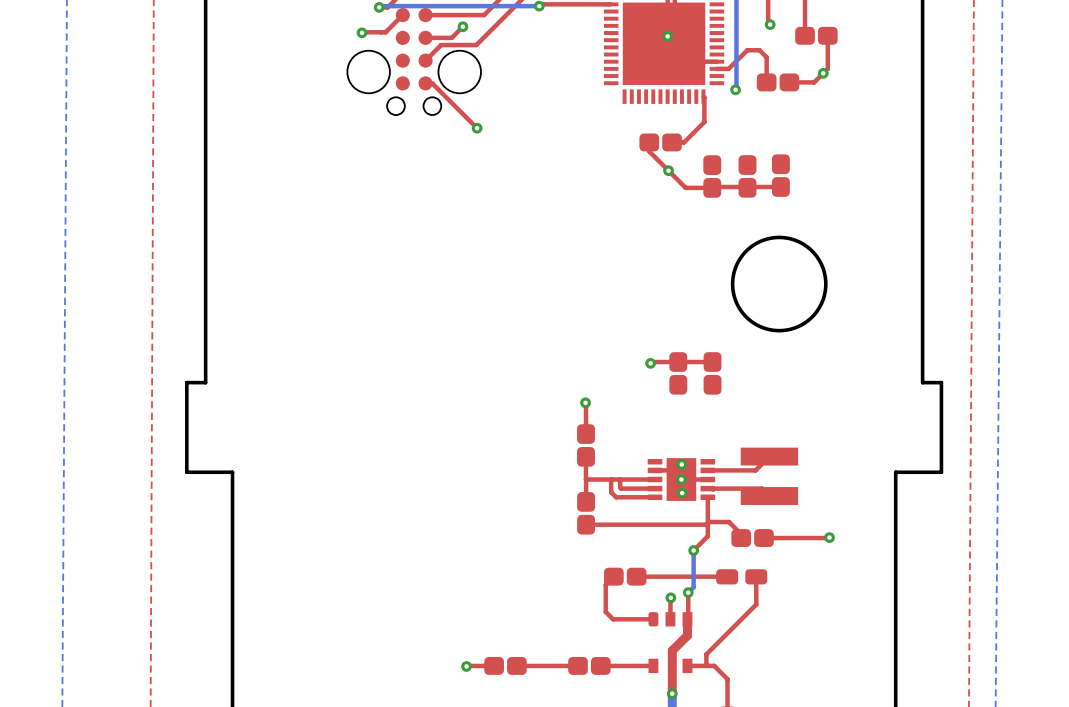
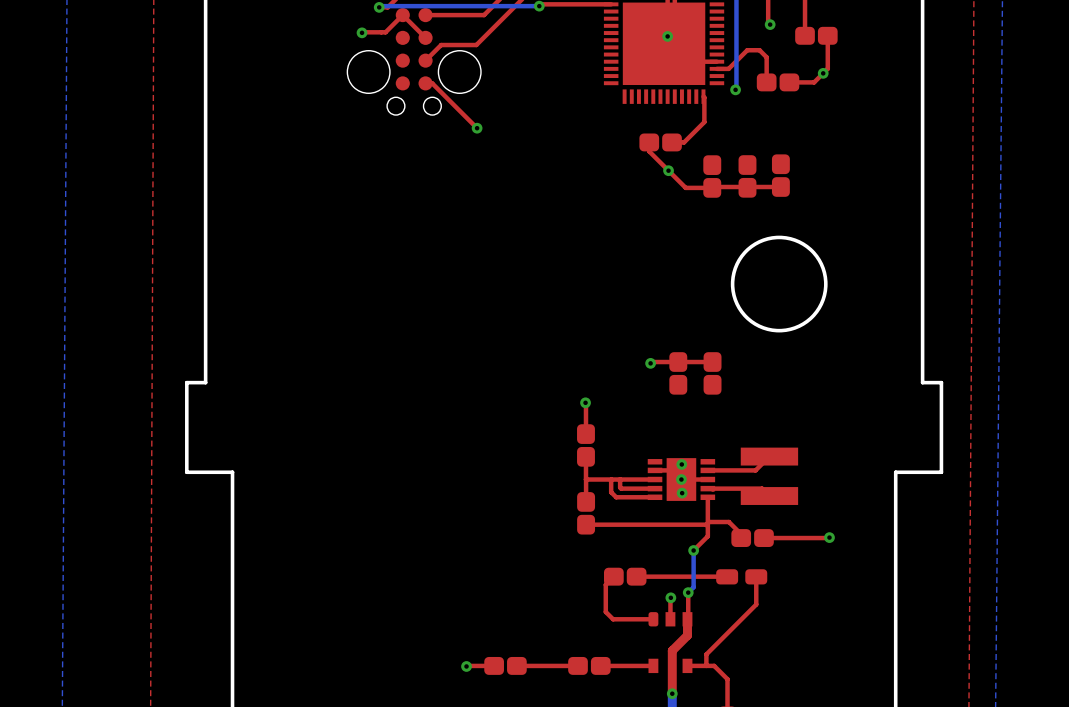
top track: (462, 26) (451, 37) (425, 37) -> (402, 15) (425, 37)
via: (462, 26) -> none

